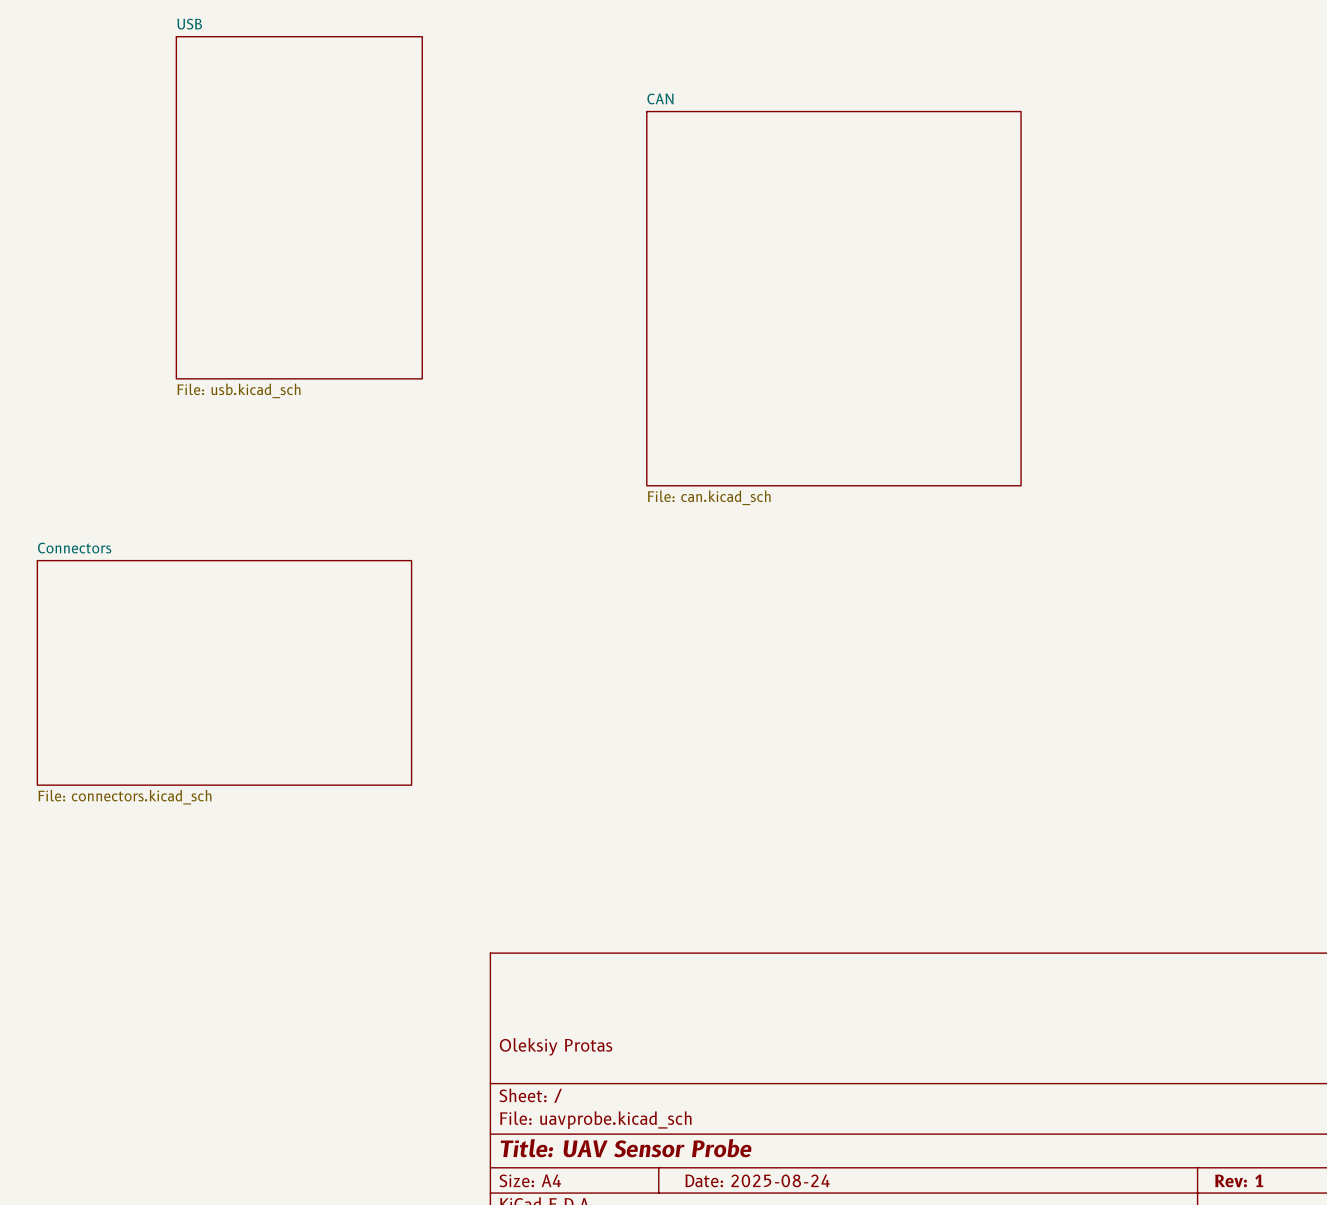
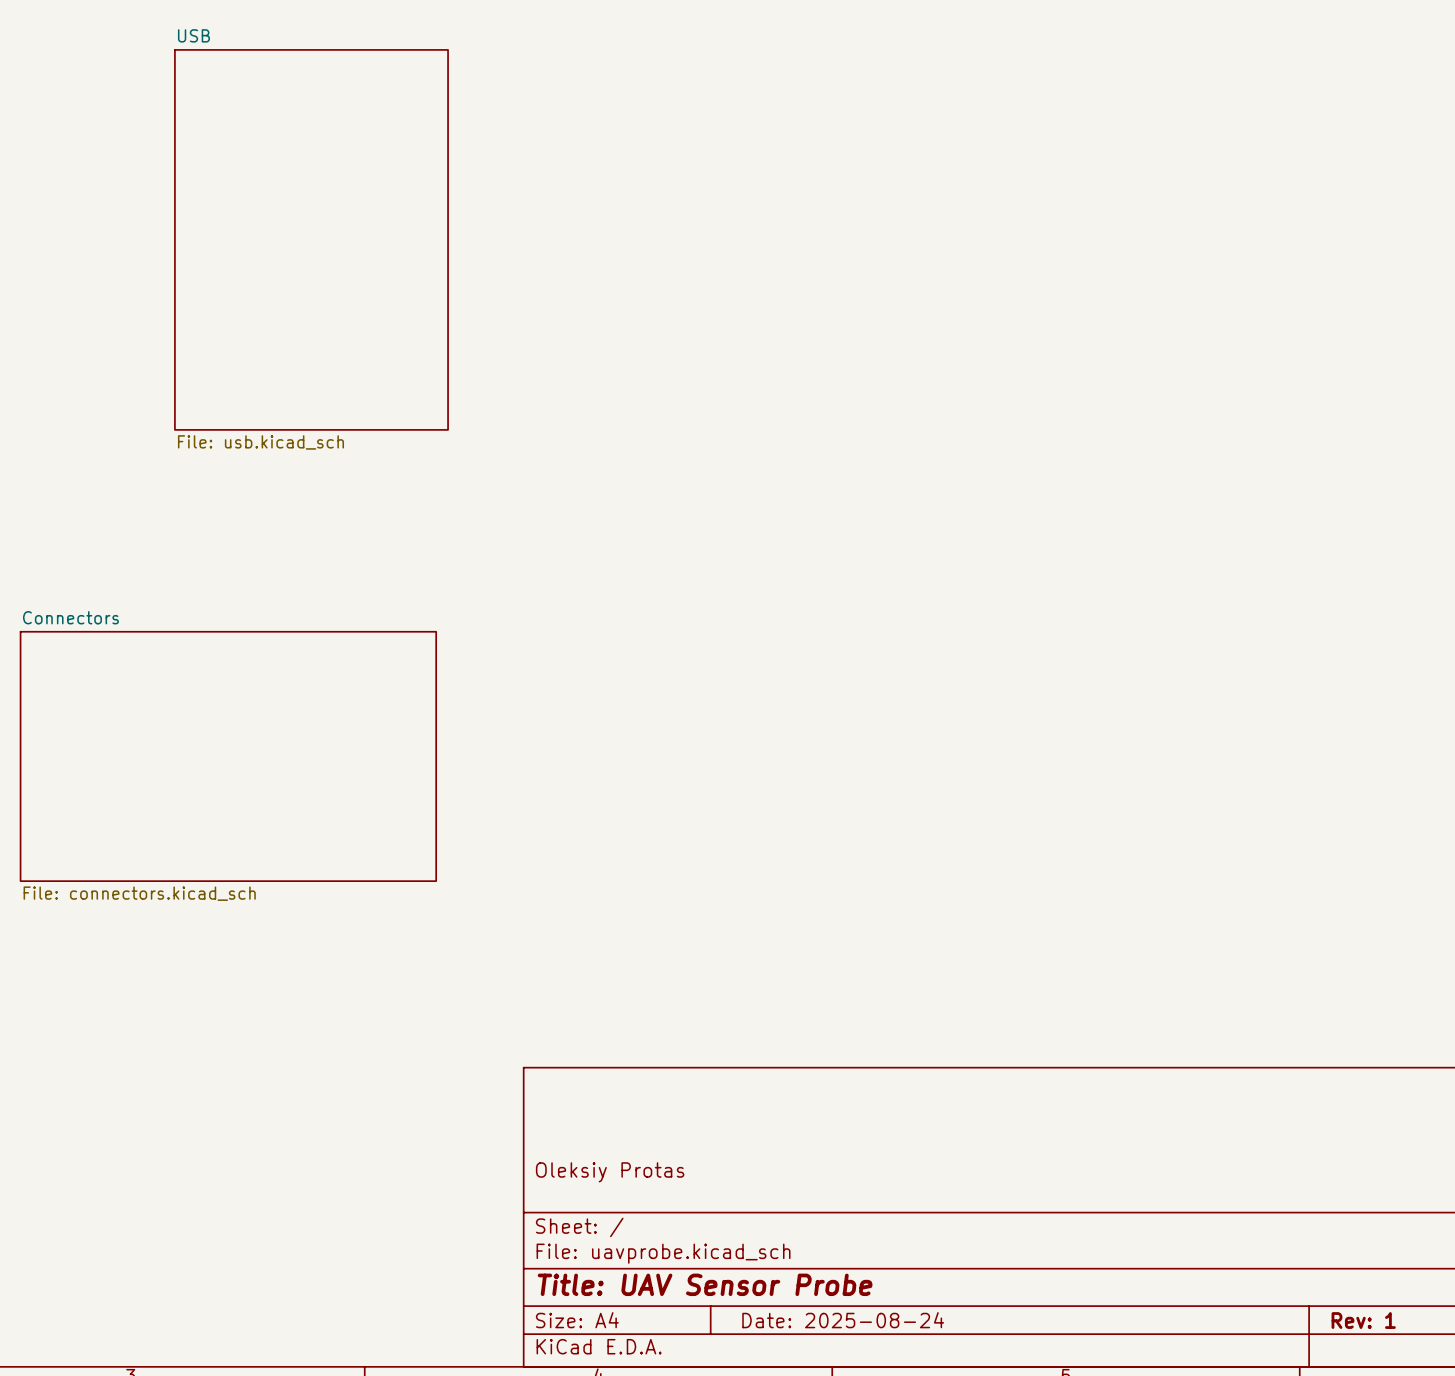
sheet CAN: File: can.kicad_sch (833, 298) -> none

